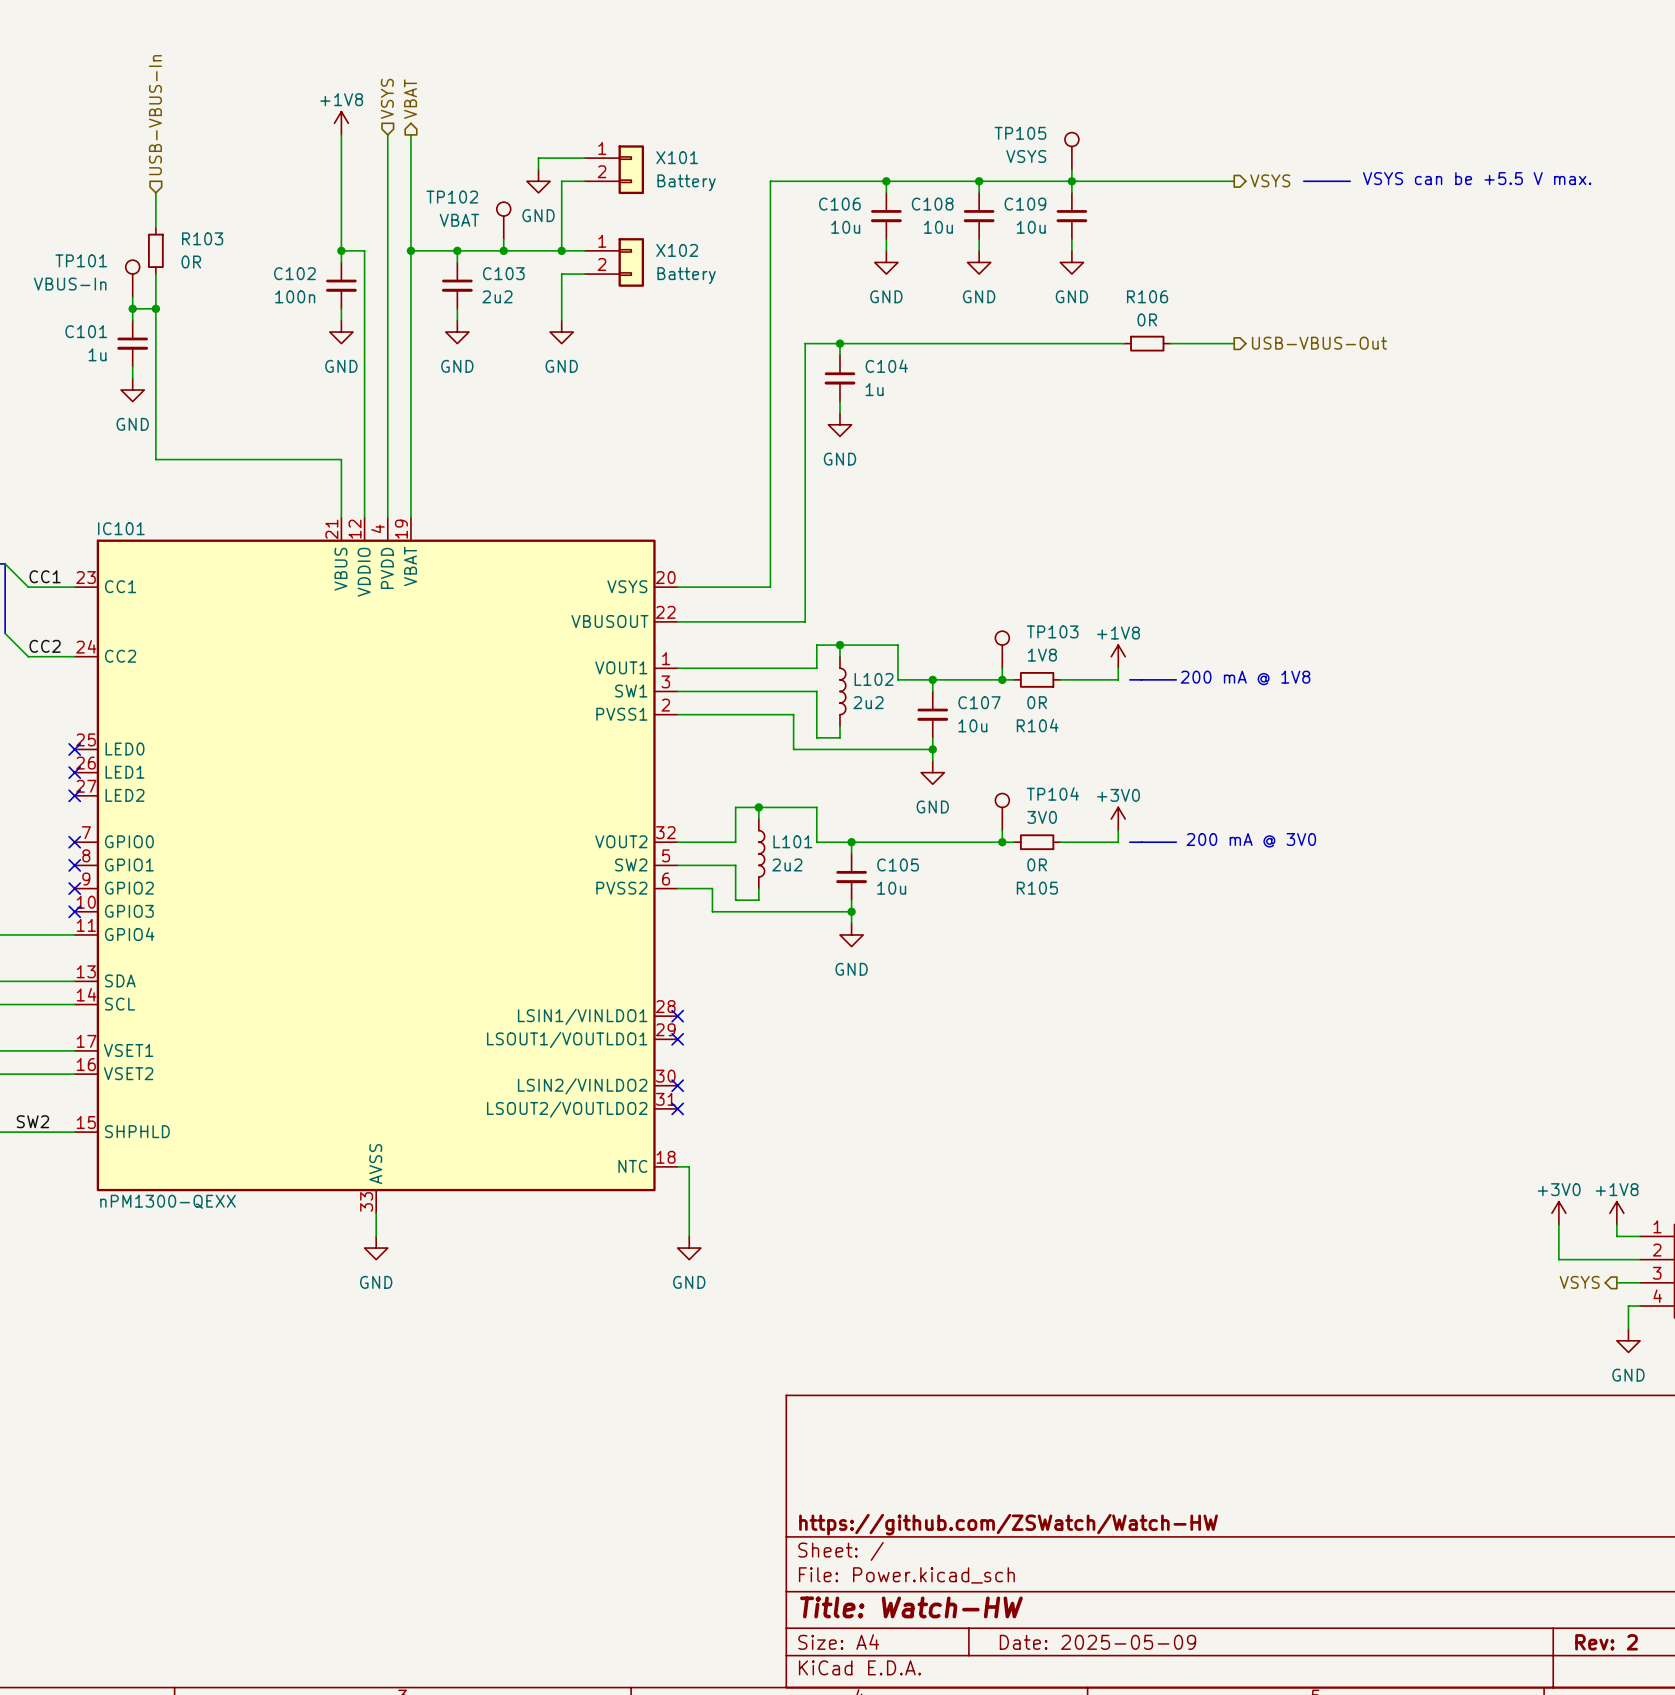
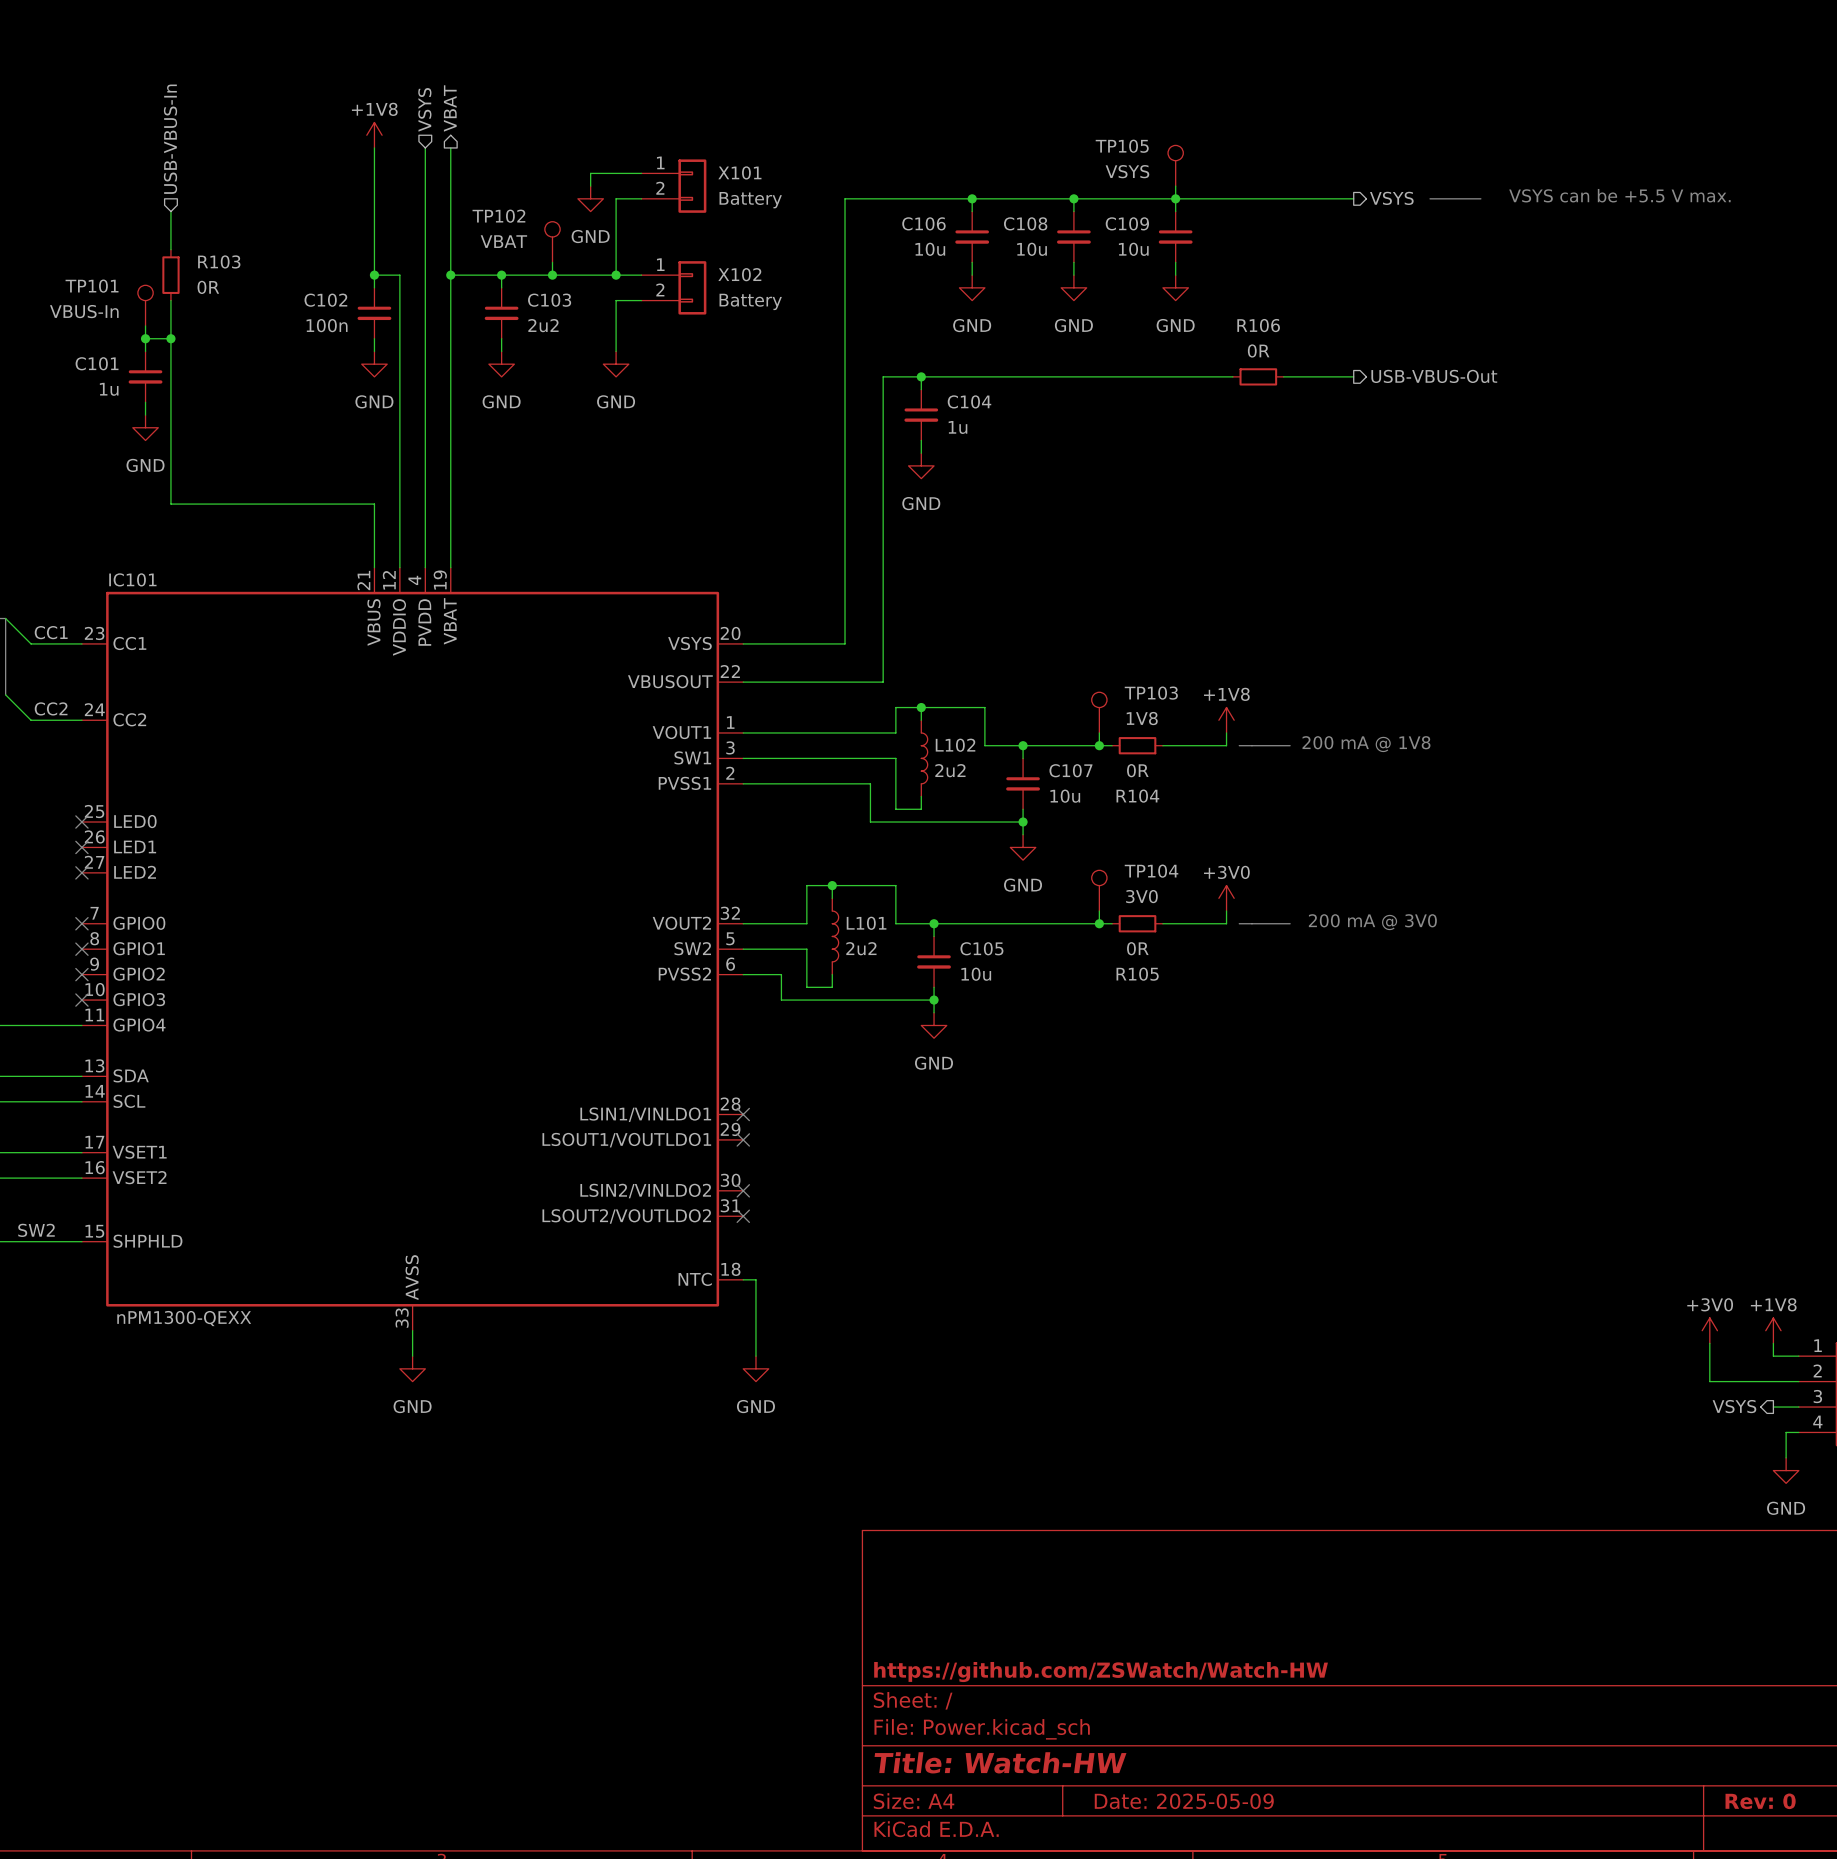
title block: Rev: 2 (1606, 1642) -> Rev: 0 (1760, 1801)

